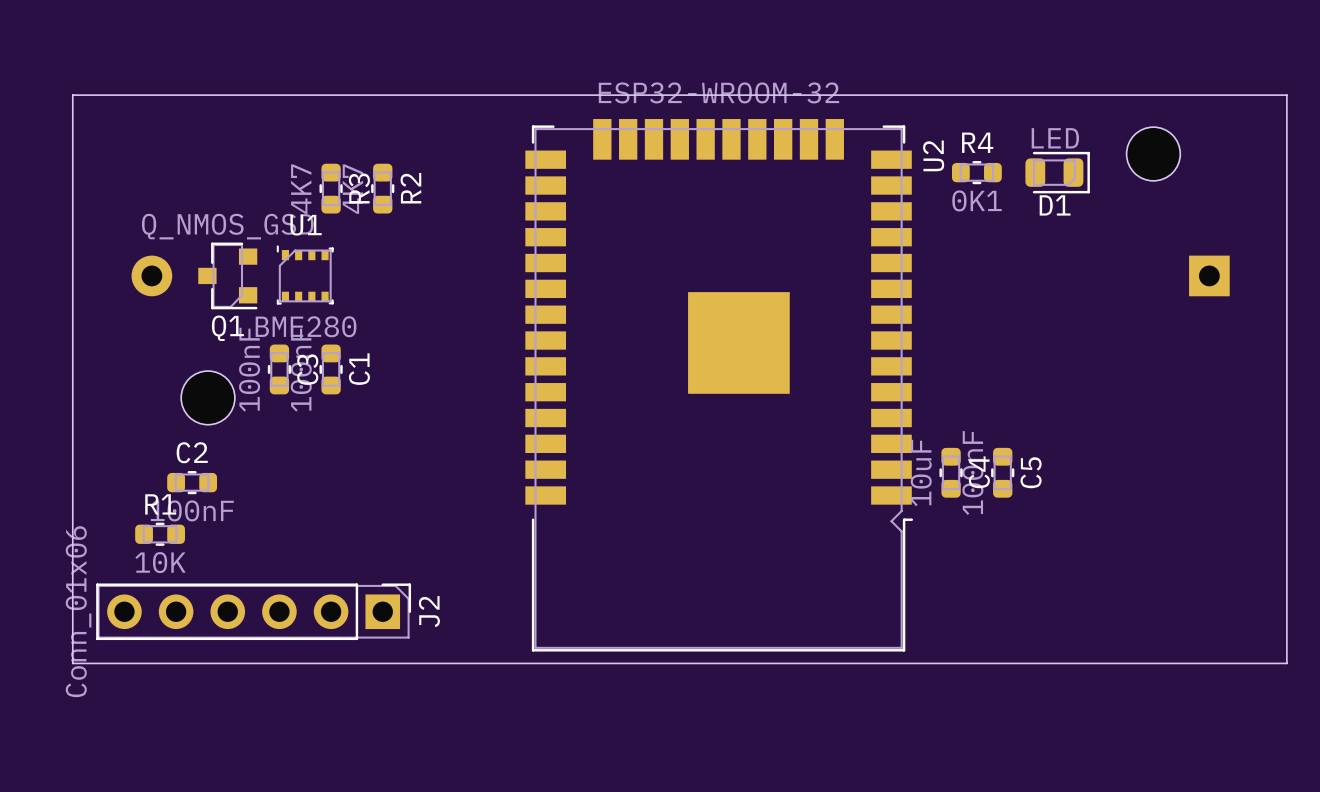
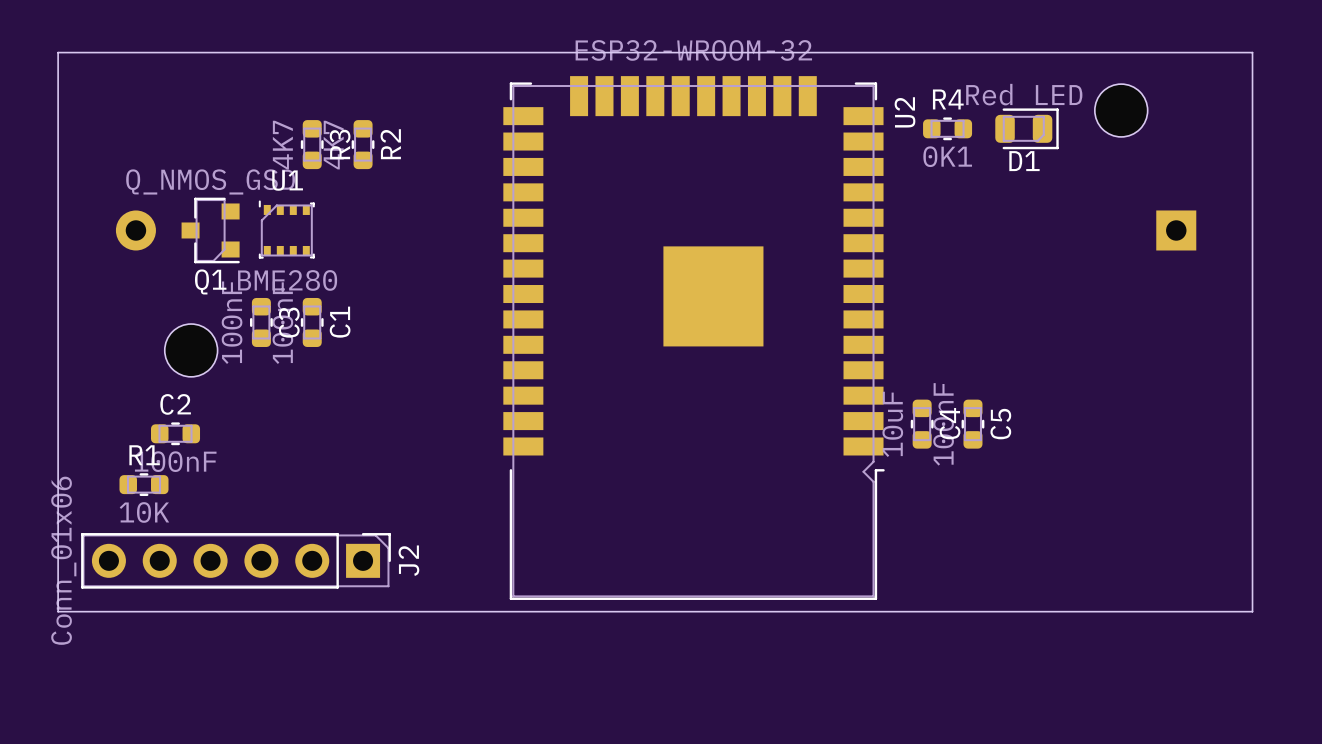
D1 value: LED (1055, 138) -> Red LED (1024, 94)

